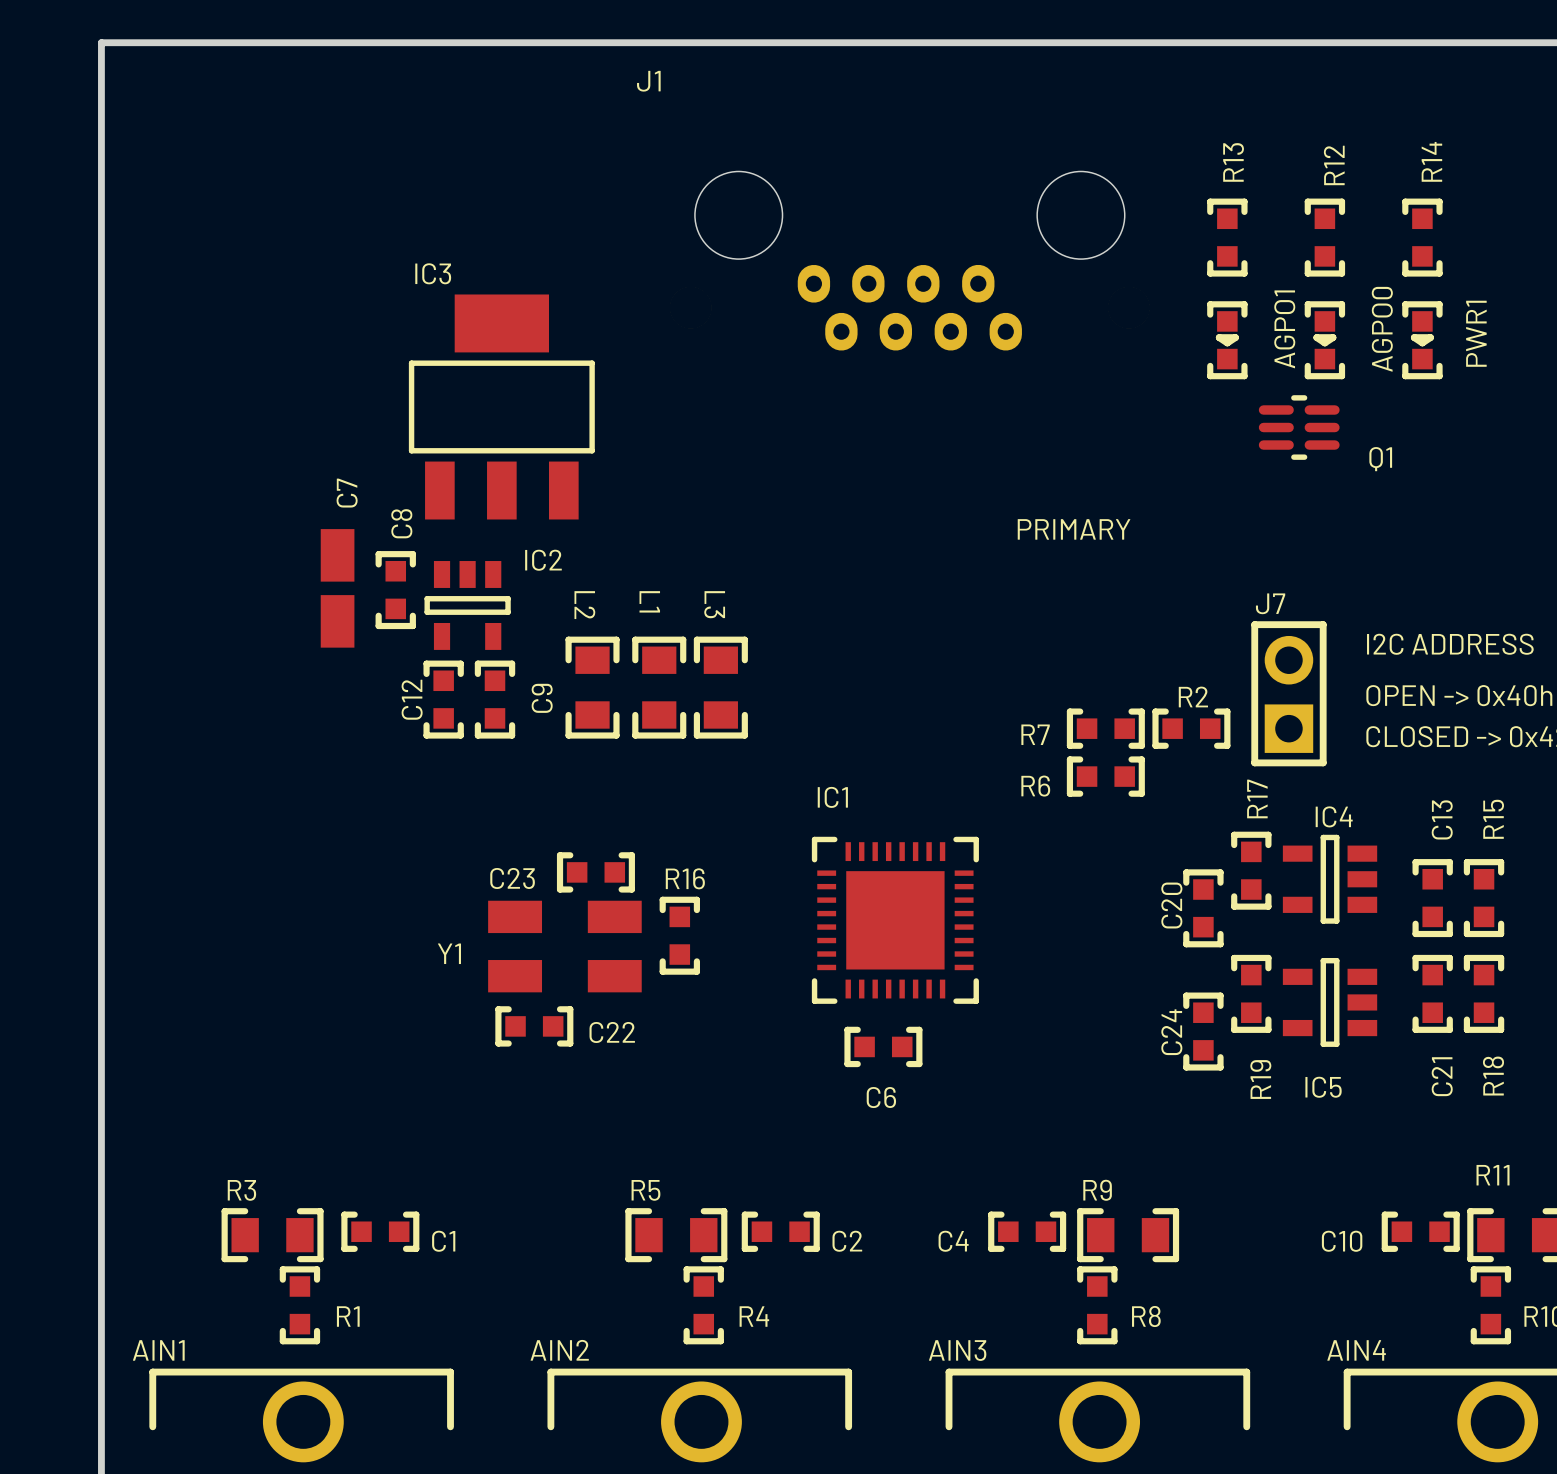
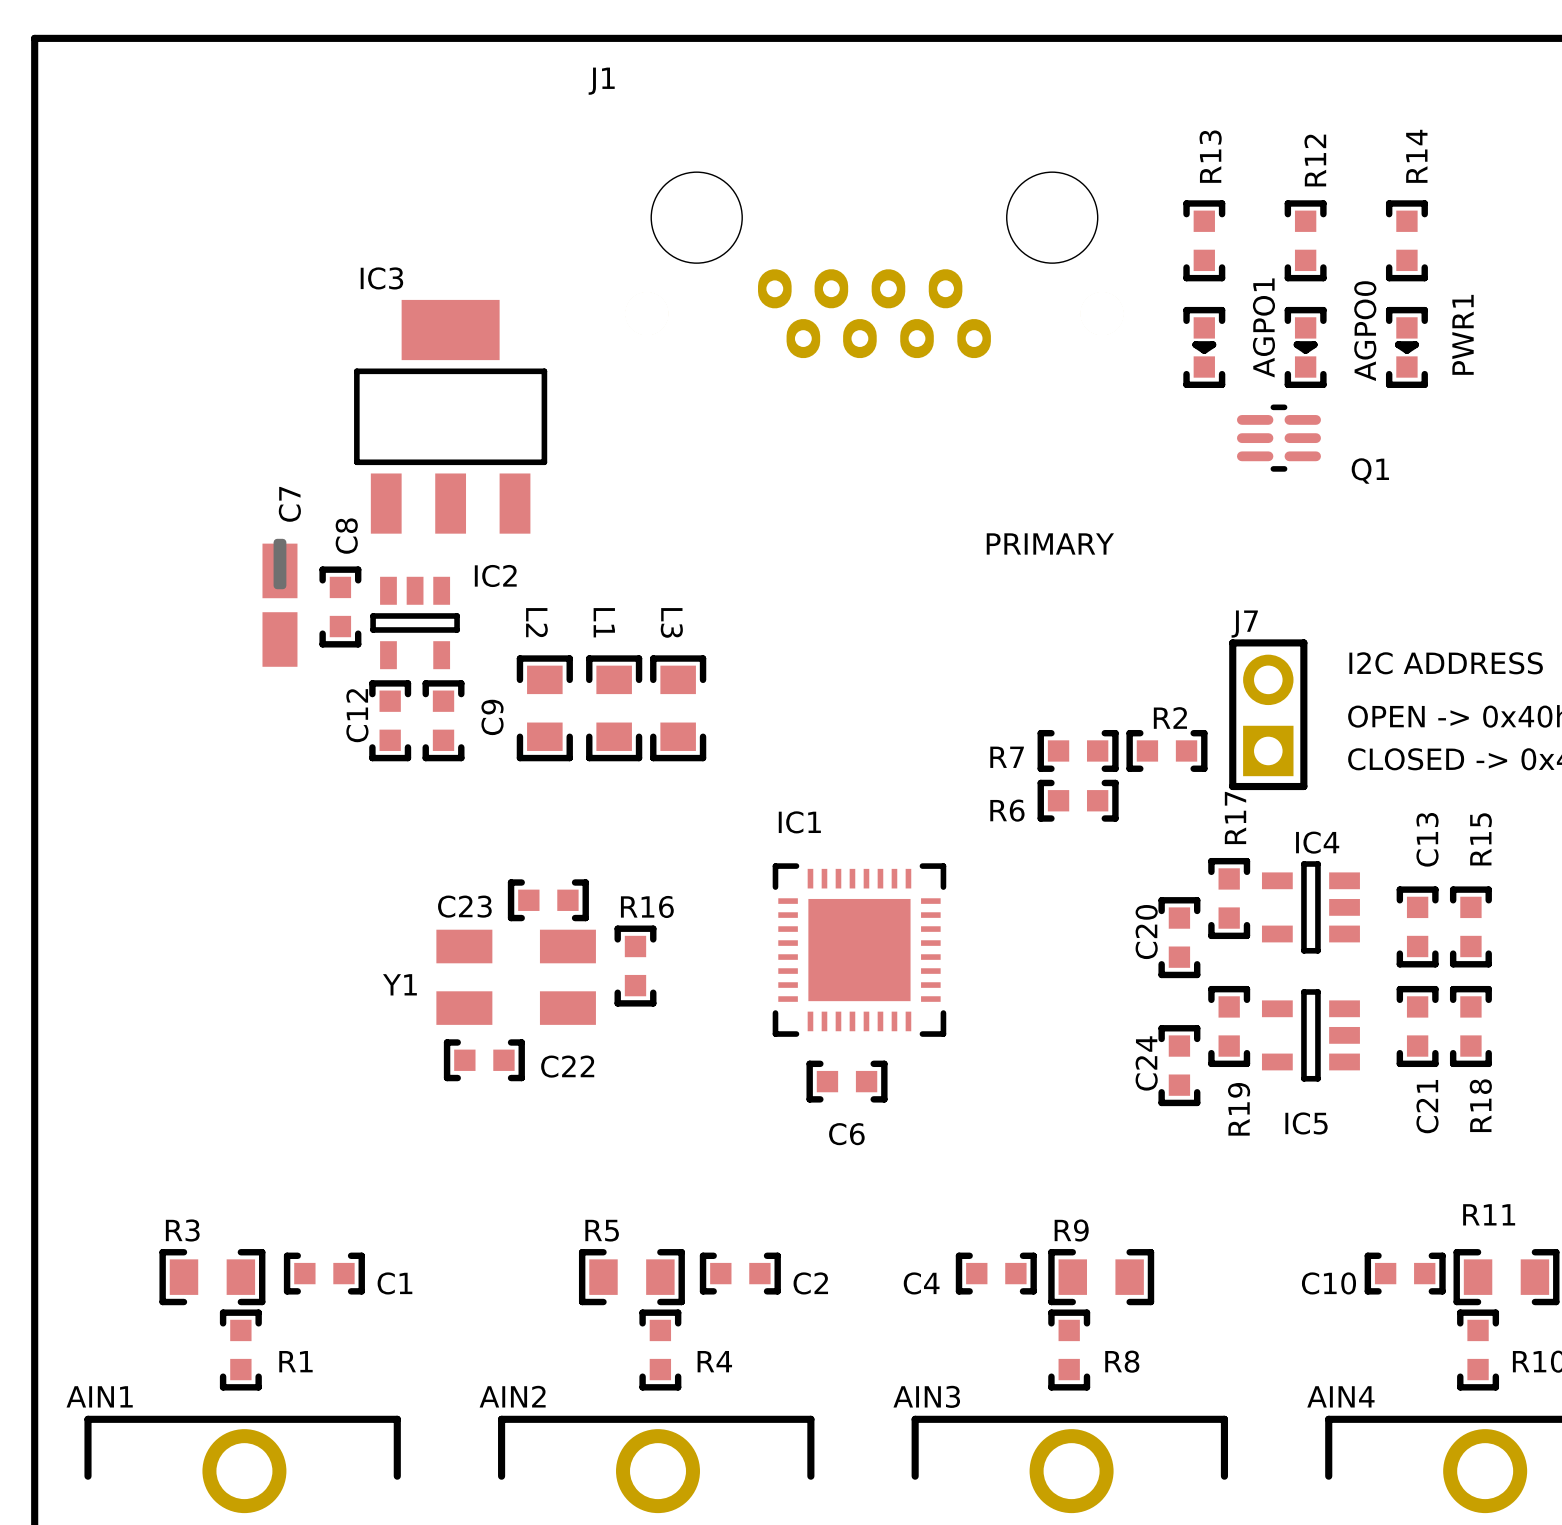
drawing: none -> [273, 538, 287, 590]

